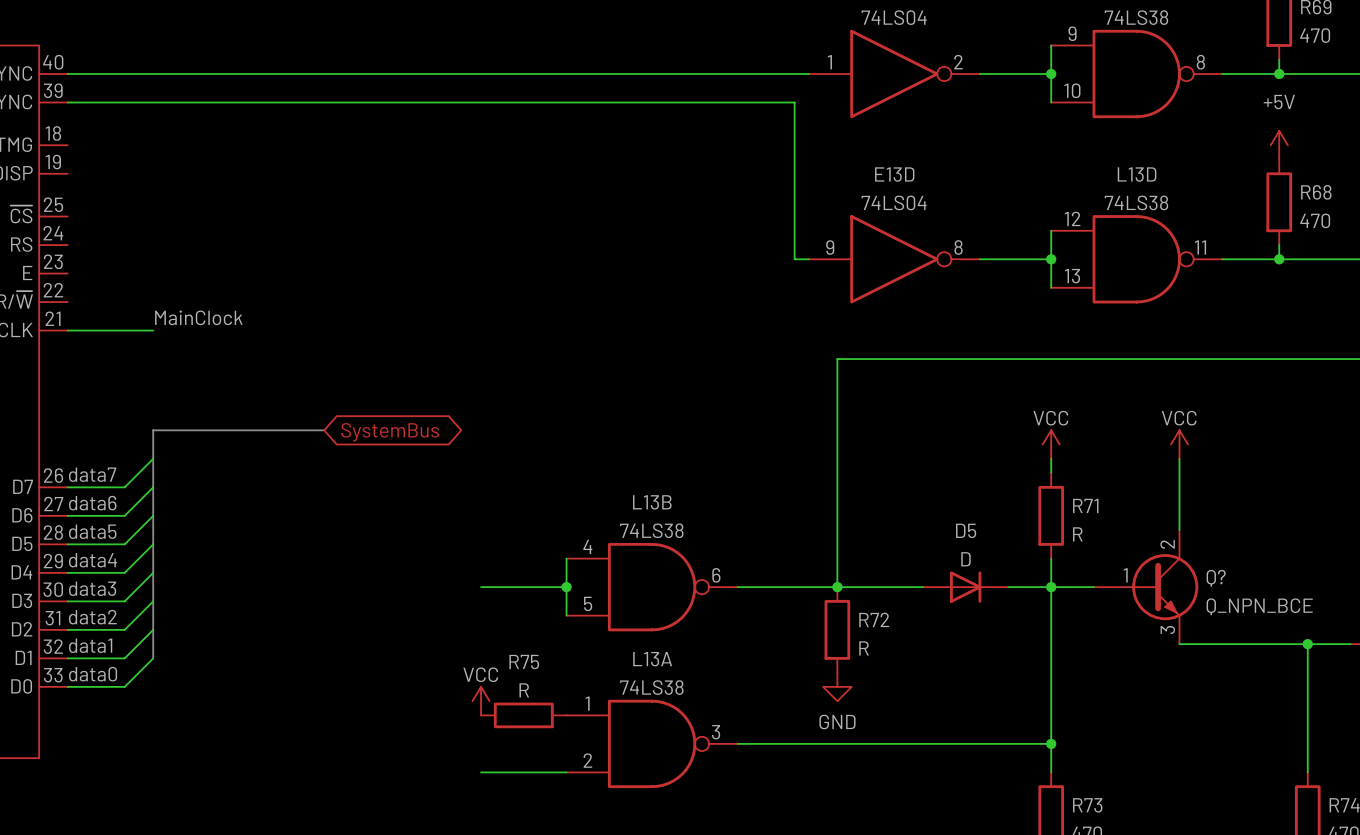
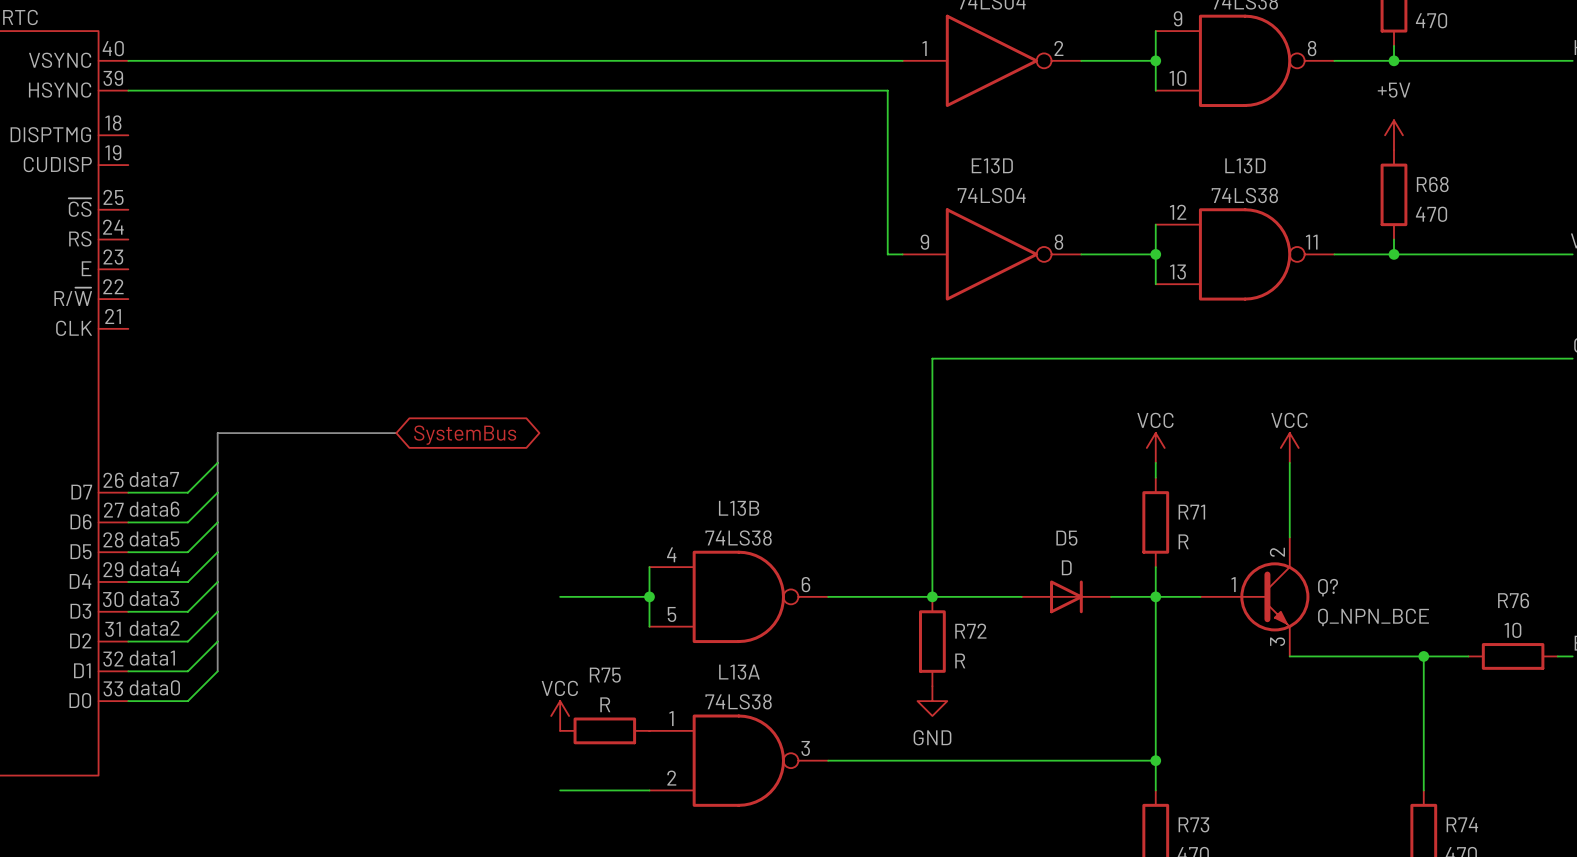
label: MainClock (198, 317) -> none
wire: (67, 330) (153, 330) -> none

